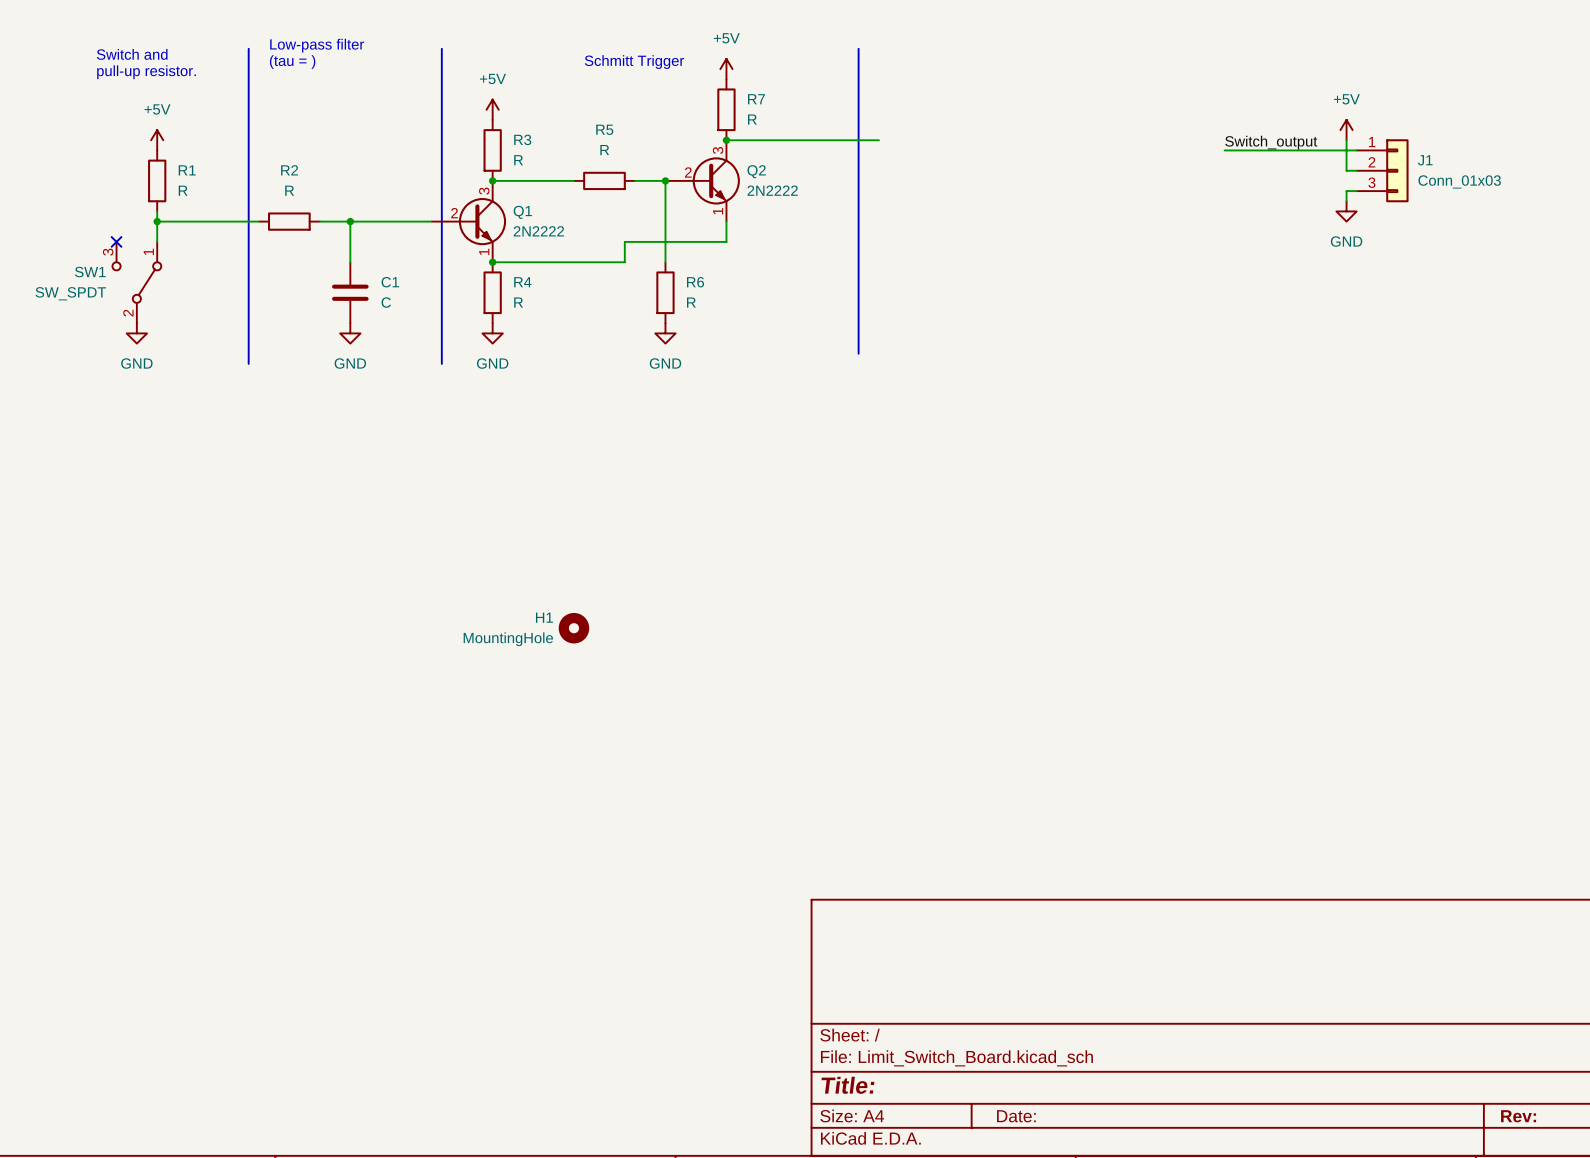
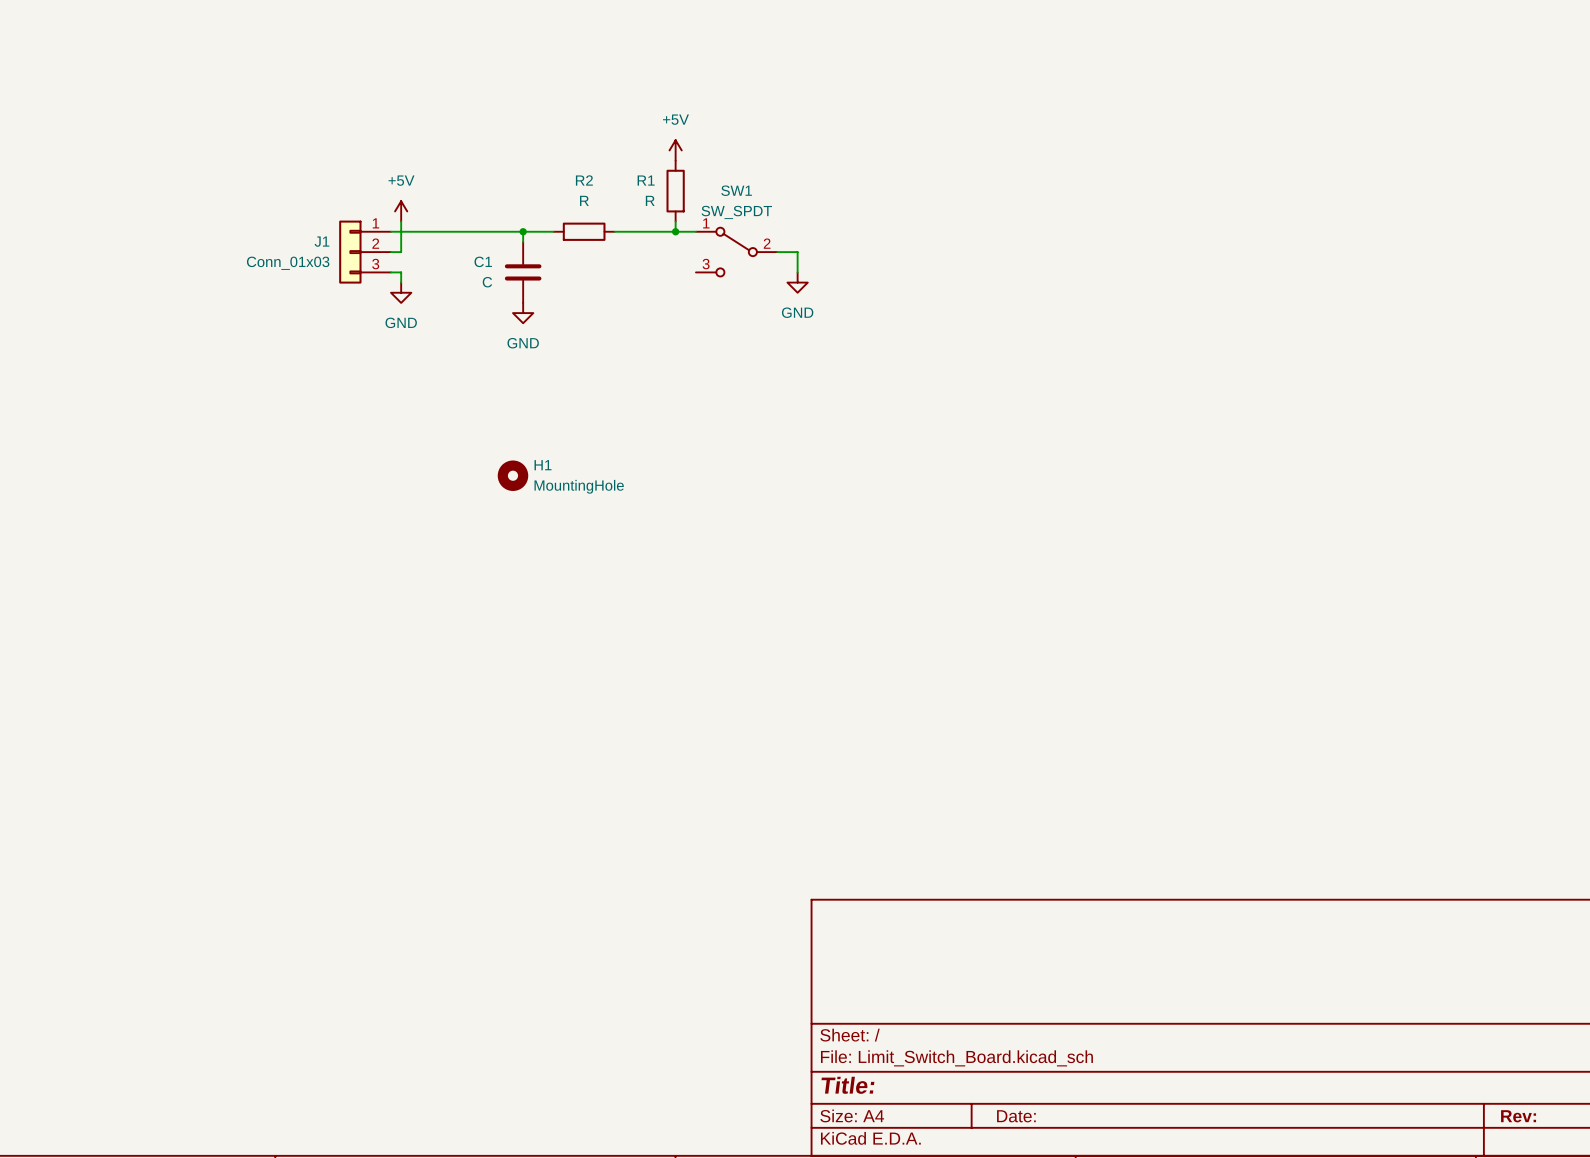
text: Low-pass filter (317, 45) -> none
line: (248, 48) (248, 363) -> none
line: (441, 48) (441, 363) -> none
line: (858, 48) (858, 353) -> none
text: Switch and (132, 54) -> none
text: (tau = ) (292, 62) -> none
text: Schmitt Trigger (634, 62) -> none
power symbol: +5V (726, 69) -> none
text: pull-up resistor. (146, 72) -> none
power symbol: +5V (492, 109) -> none
R7: R (726, 109) -> none
power symbol: +5V (1346, 130) -> none
power symbol: +5V (157, 140) -> none
wire: (726, 140) (878, 140) -> none
junction: (726, 140) -> none
wire: (1346, 140) (1346, 170) (1356, 170) -> none
label: Switch_output (1271, 142) -> none
R3: R (492, 150) -> none
power symbol: none -> +5V (675, 150)
wire: (1224, 150) (1356, 150) -> none
R1 name position: R1 (187, 170) -> R1 (646, 180)
J1 position: (1382, 170) -> (365, 252)
J1 flip: as is (1397, 170) -> left-right (350, 252)
R1 position: (157, 180) -> (675, 191)
wire: (492, 180) (573, 180) -> (614, 231) (695, 231)
junction: (492, 180) -> none
R5: R (604, 180) -> none
wire: (634, 180) (665, 180) (665, 262) -> none
junction: (665, 180) -> none
Q2: 2N2222 (702, 180) -> none
R1 value position: R (183, 190) -> R (650, 200)
wire: (1356, 191) (1346, 191) (1346, 201) -> none
wire: (157, 211) (157, 241) -> none
power symbol: none -> +5V (401, 211)
power symbol: GND (1346, 211) -> none
wire: (157, 221) (258, 221) -> none
junction: (157, 221) -> none
R2 position: (289, 221) -> (584, 231)
wire: (319, 221) (431, 221) -> none
junction: (350, 221) -> none
wire: none -> (401, 221) (401, 252) (391, 252)
Q1: 2N2222 (468, 221) -> none
wire: none -> (675, 221) (675, 231)
wire: (726, 221) (726, 241) (624, 241) (624, 262) (492, 262) -> none
wire: none -> (391, 231) (553, 231)
wire: none -> (523, 231) (523, 241)
junction: none -> (523, 231)
junction: none -> (675, 231)
no-connect mark: (116, 241) -> none
wire: none -> (777, 252) (797, 252) (797, 272)
junction: (492, 262) -> none
SW1 name position: SW1 (90, 272) -> SW1 (736, 190)
wire: none -> (391, 272) (401, 272) (401, 282)
SW1 rotation: 0° (136, 282) -> 90° counterclockwise (736, 252)
SW1 position: (136, 282) -> (736, 252)
C1 name position: C1 (390, 282) -> C1 (483, 261)
power symbol: none -> GND (797, 282)
C1 position: (350, 292) -> (523, 272)
power symbol: none -> GND (401, 292)
R4: R (492, 292) -> none
R6: R (665, 292) -> none
SW1 value position: SW_SPDT (70, 293) -> SW_SPDT (736, 212)
C1 value position: C (386, 302) -> C (487, 282)
power symbol: GND (136, 333) -> none
power symbol: GND (350, 333) -> none
power symbol position: GND (492, 333) -> GND (523, 313)
power symbol: GND (665, 333) -> none
H1 name position: H1 (544, 617) -> H1 (543, 465)
H1 position: (573, 628) -> (512, 475)
H1 value position: MountingHole (508, 639) -> MountingHole (579, 486)

